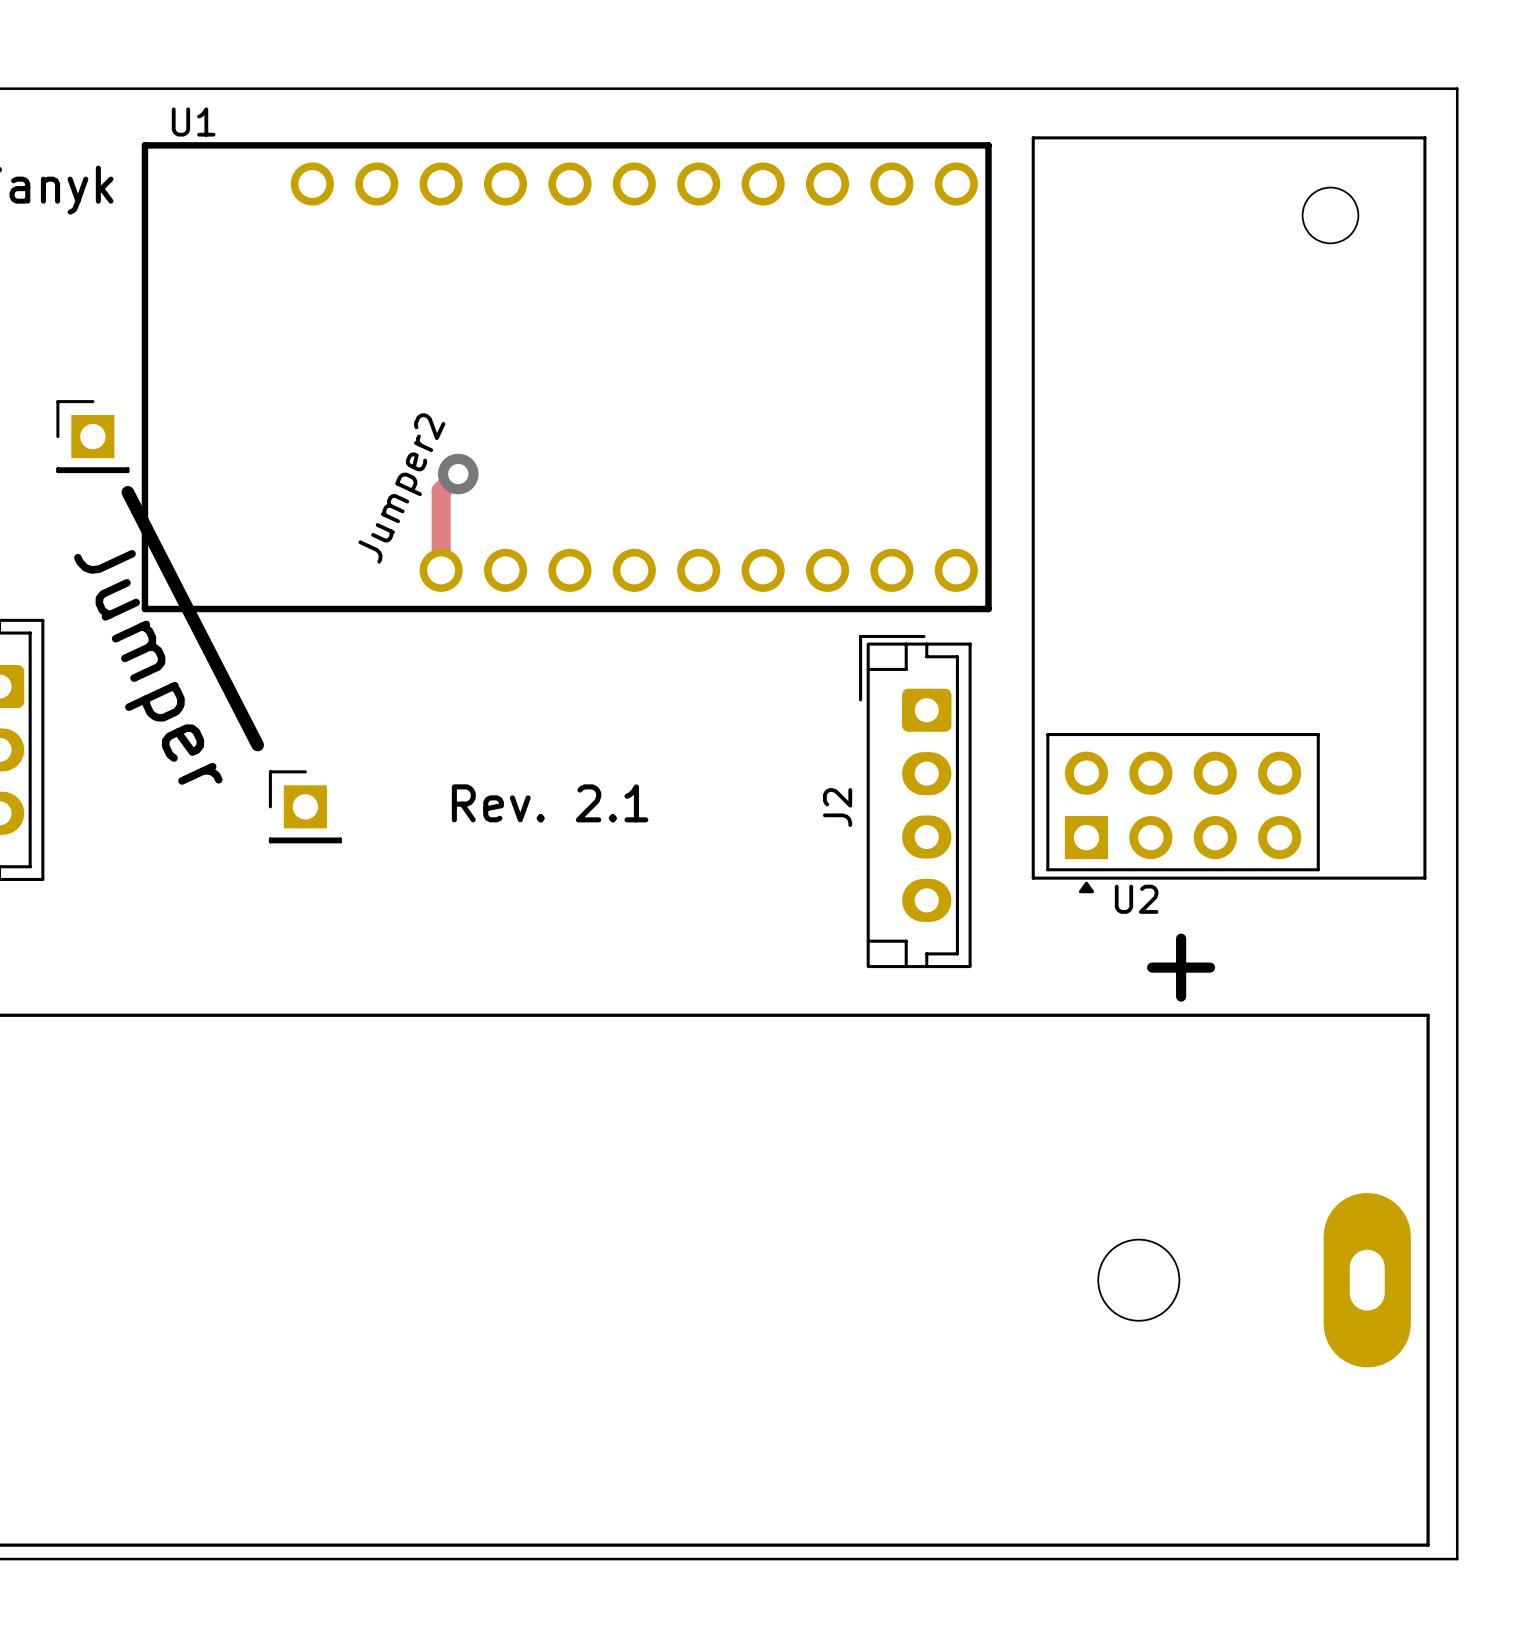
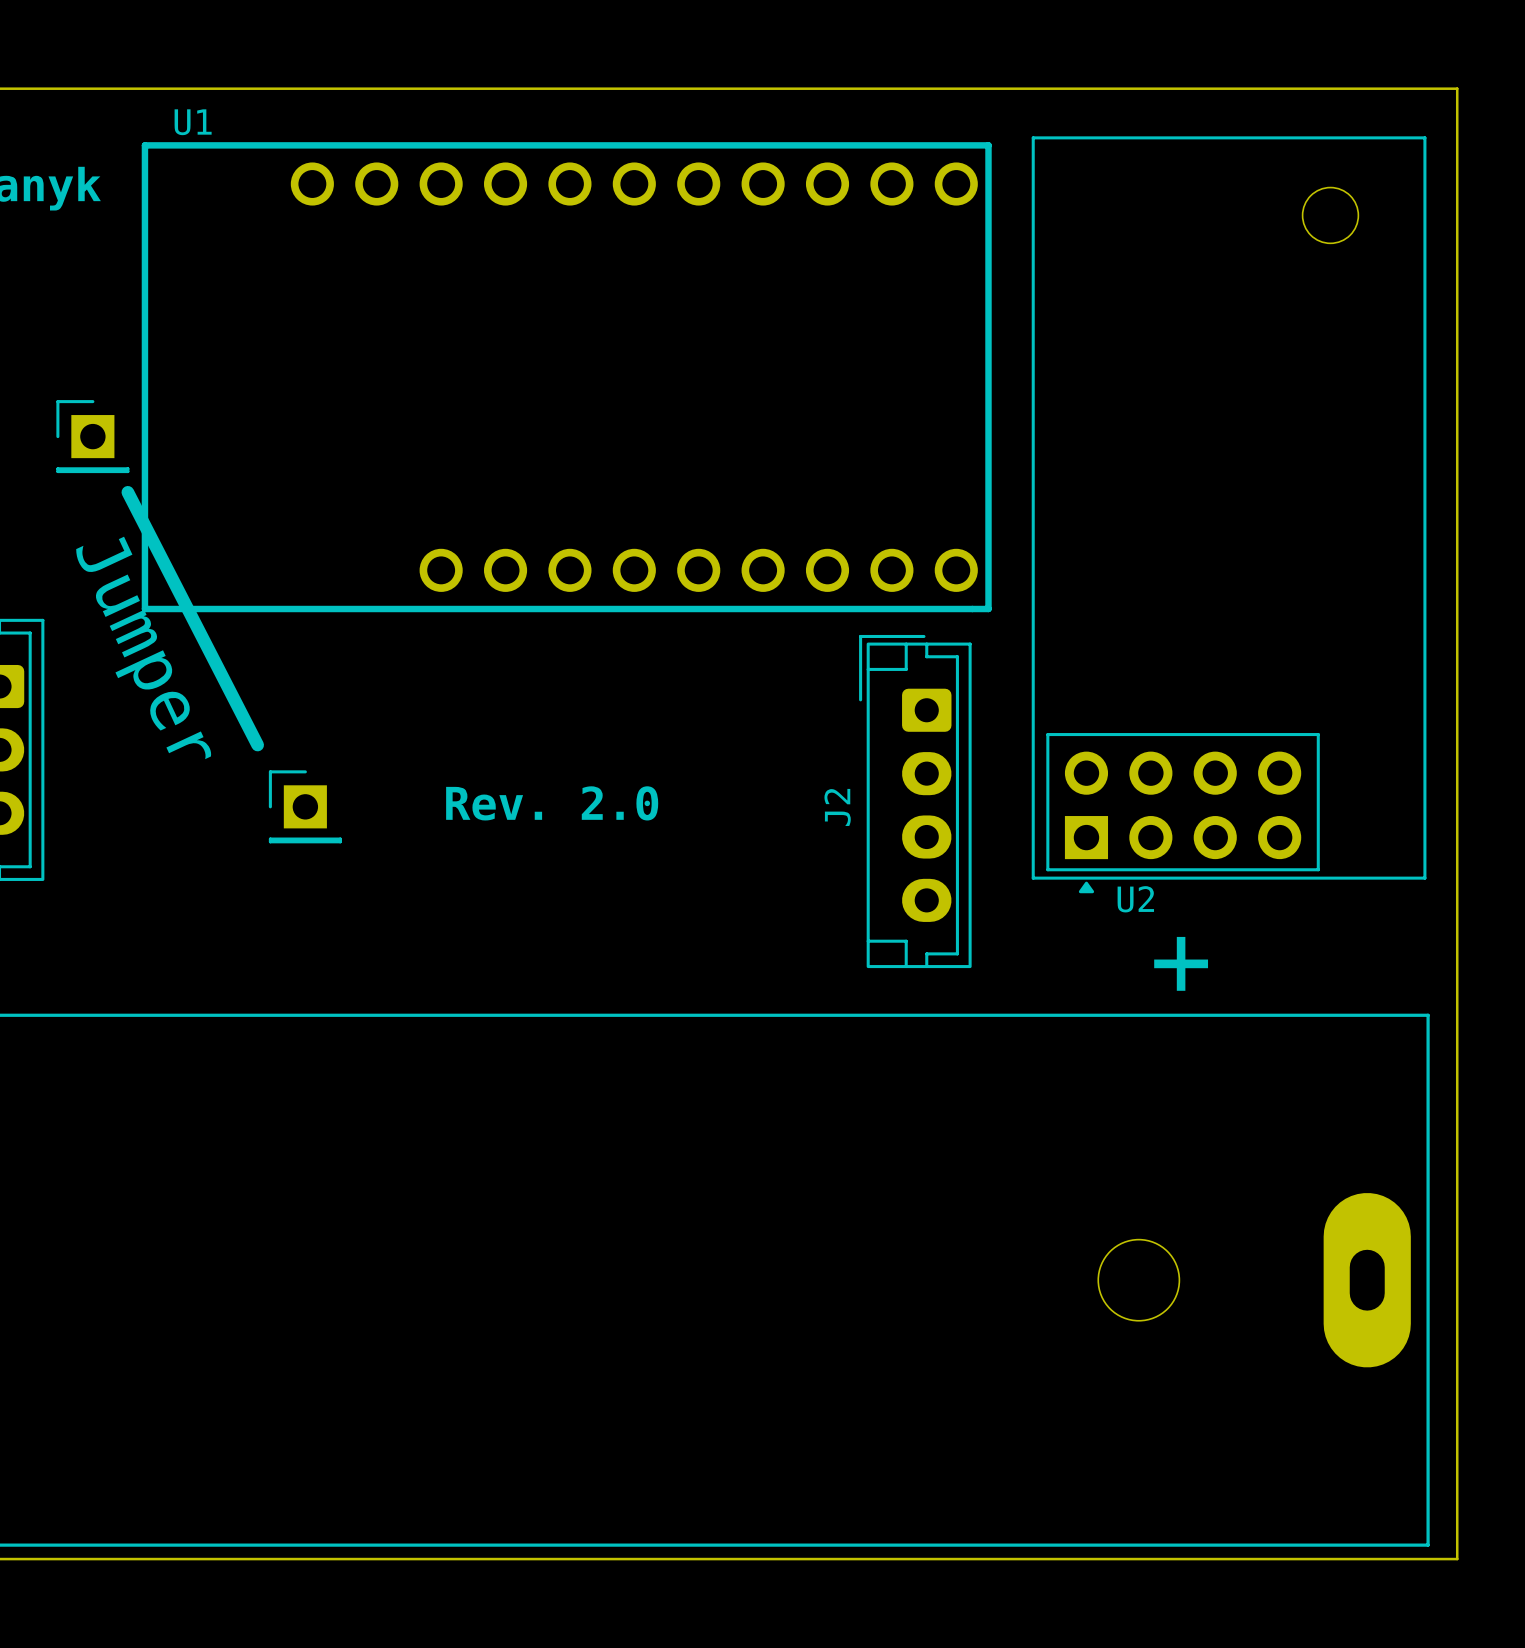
track: (458, 474) (441, 491) (441, 570) -> none
via: (458, 474) -> none
text: Jumper2 (401, 488) -> none
text: Rev. 2.1 (550, 803) -> Rev. 2.0 (552, 803)

